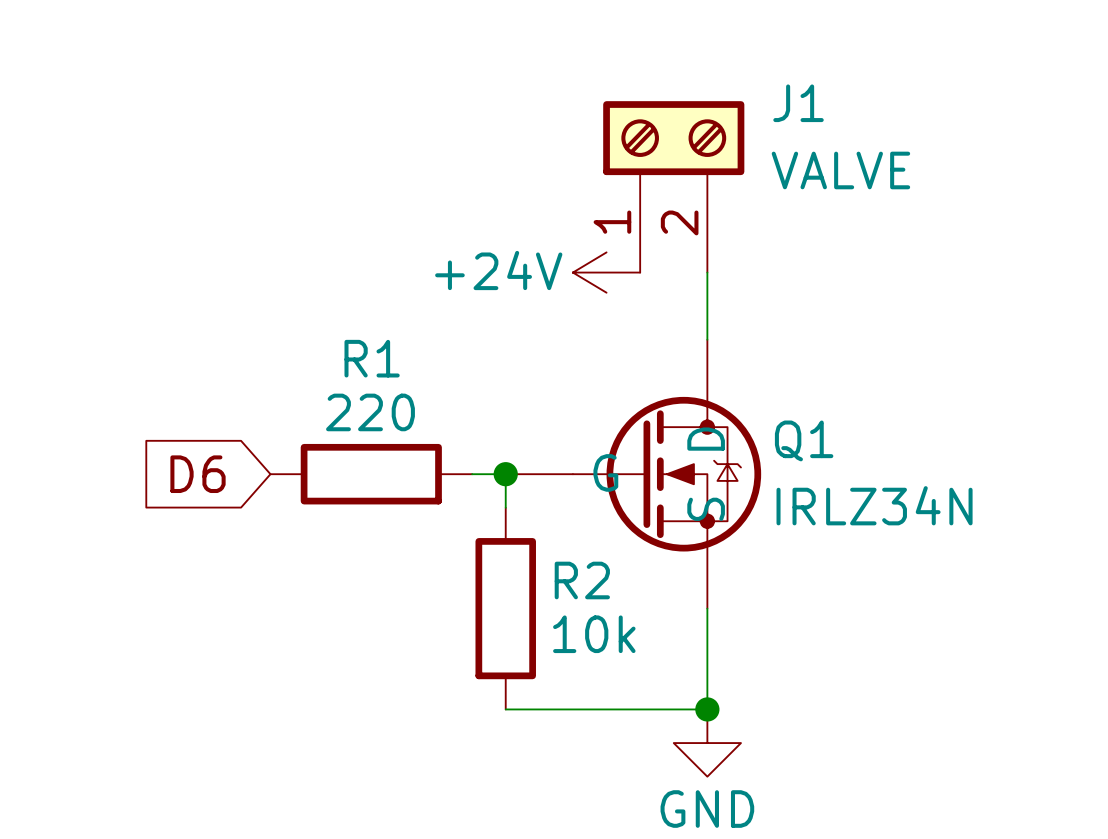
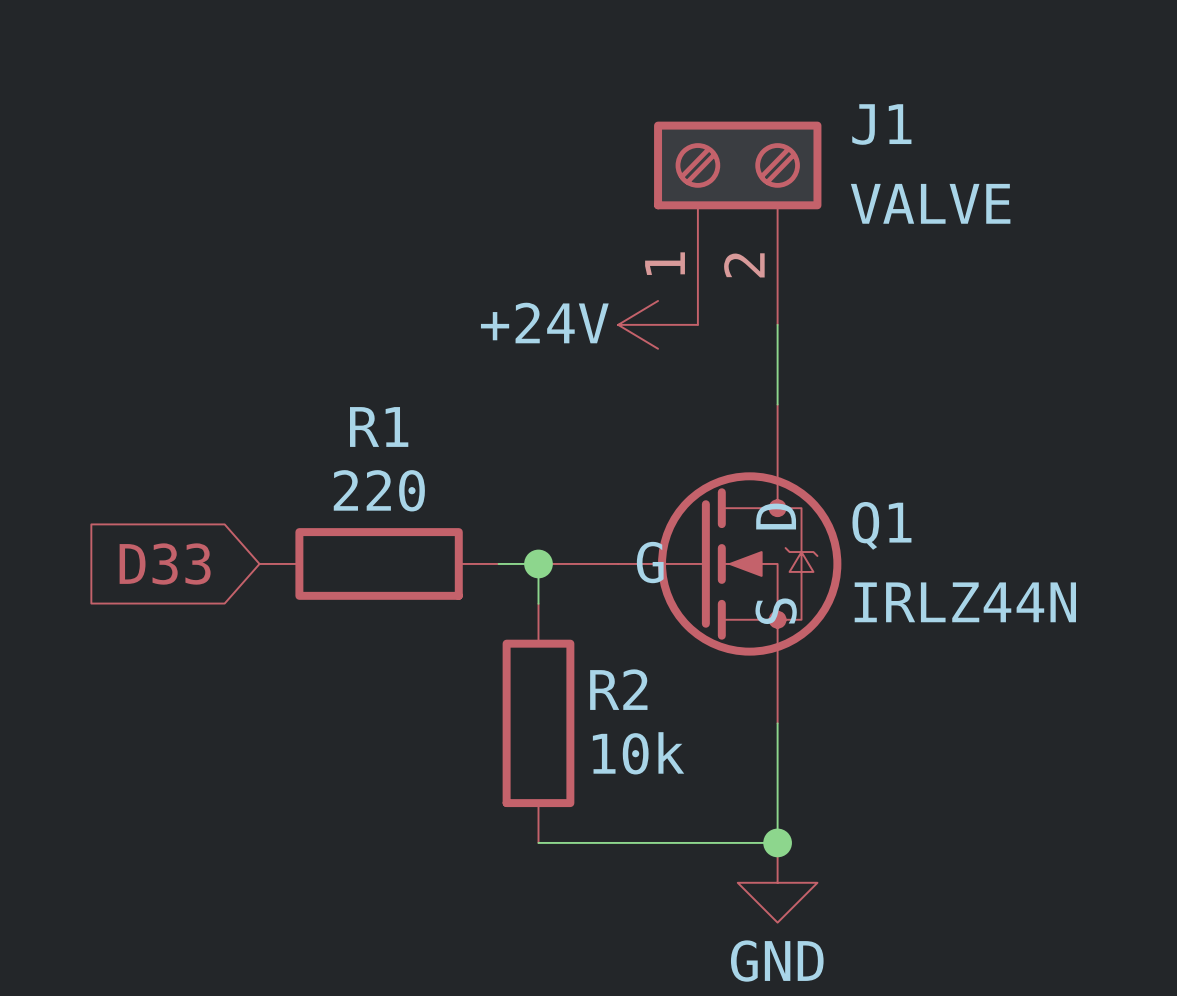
global label: D6 (198, 474) -> D33 (165, 564)
Q1 value: IRLZ34N (874, 505) -> IRLZ44N (965, 602)

